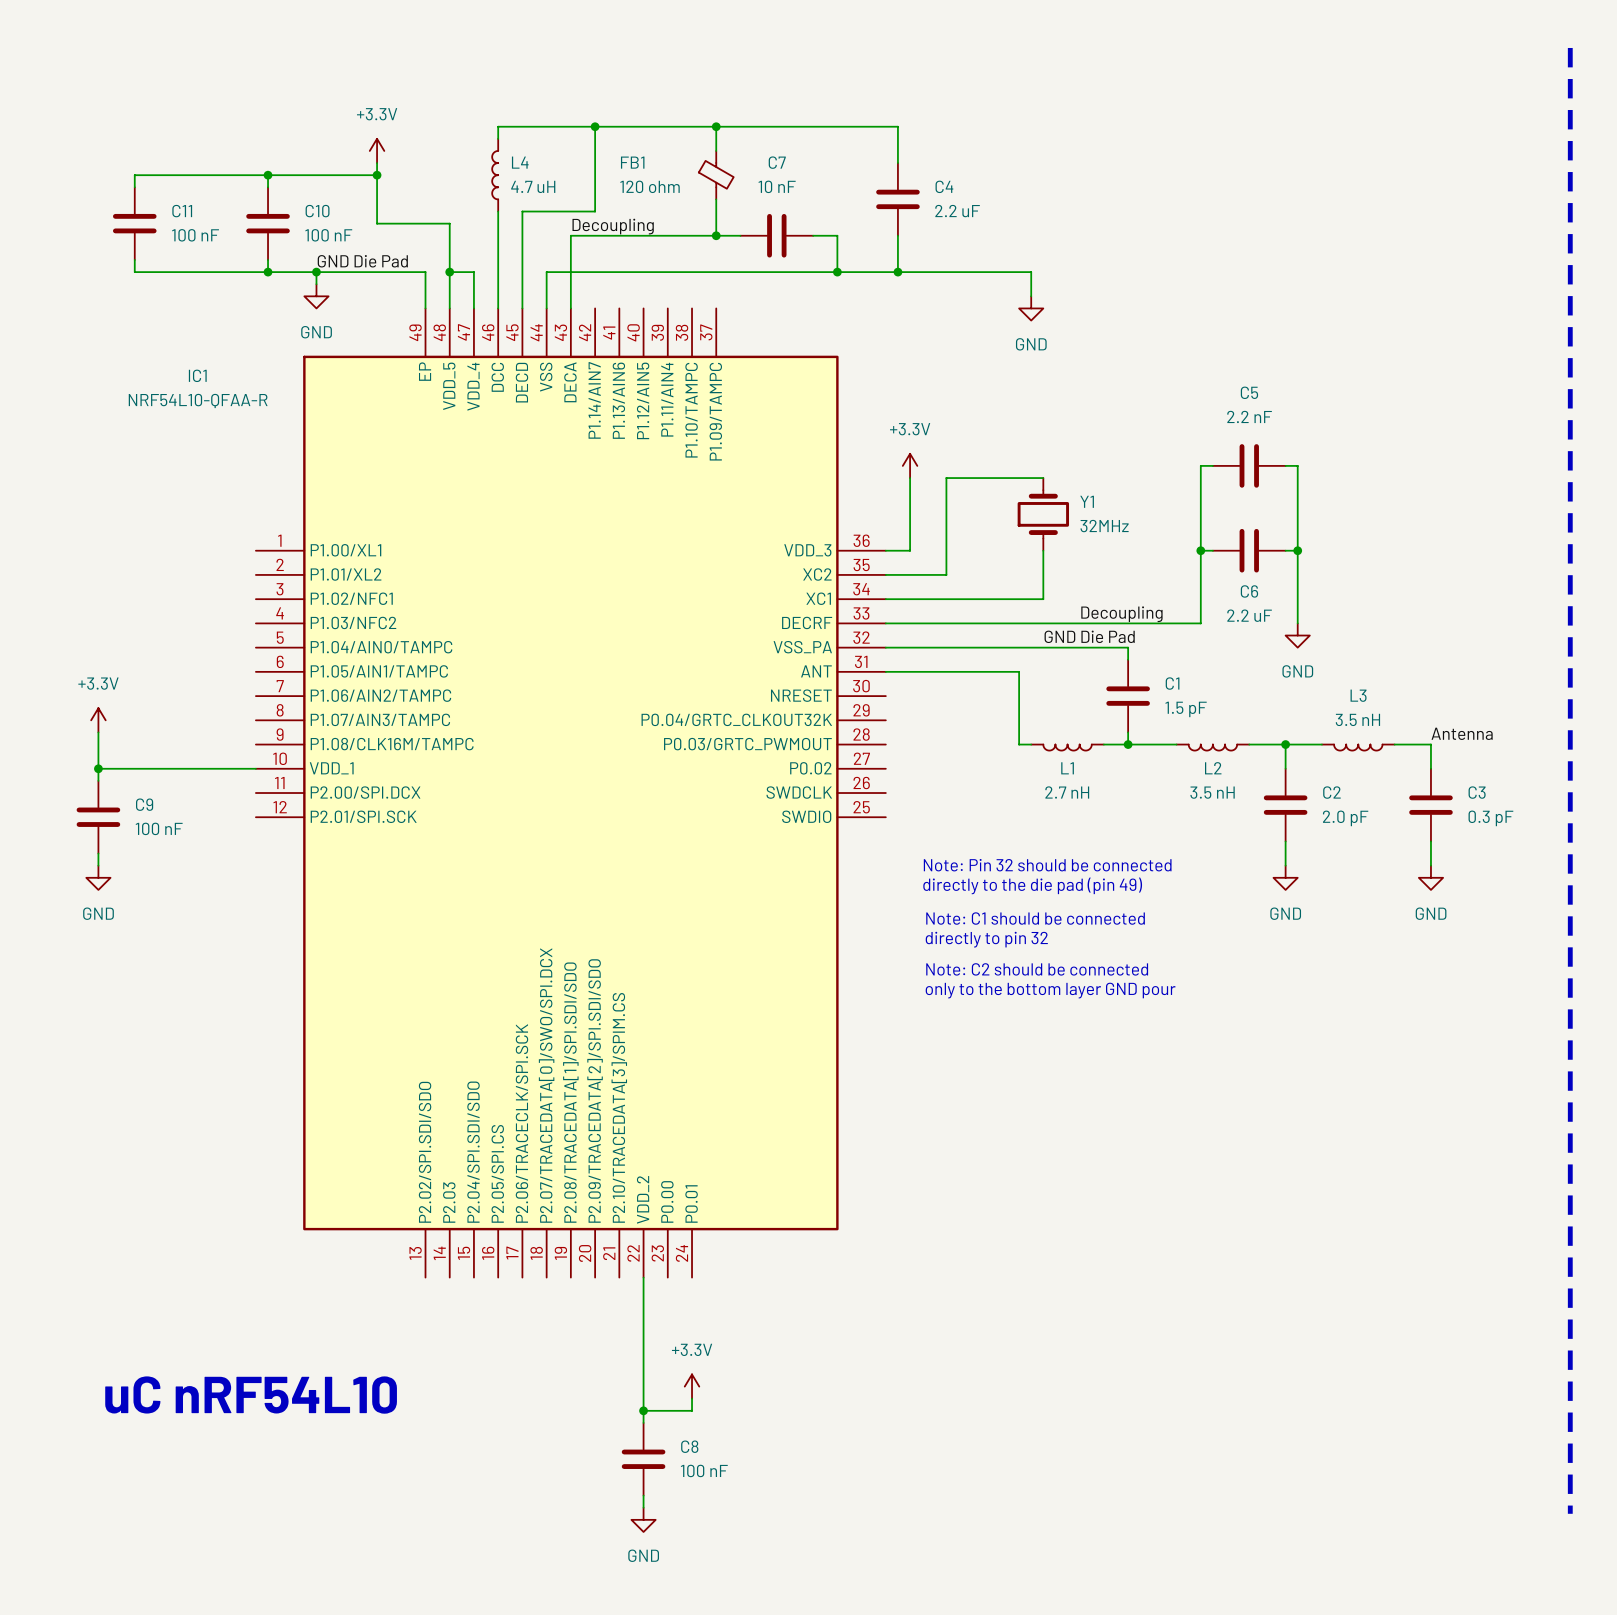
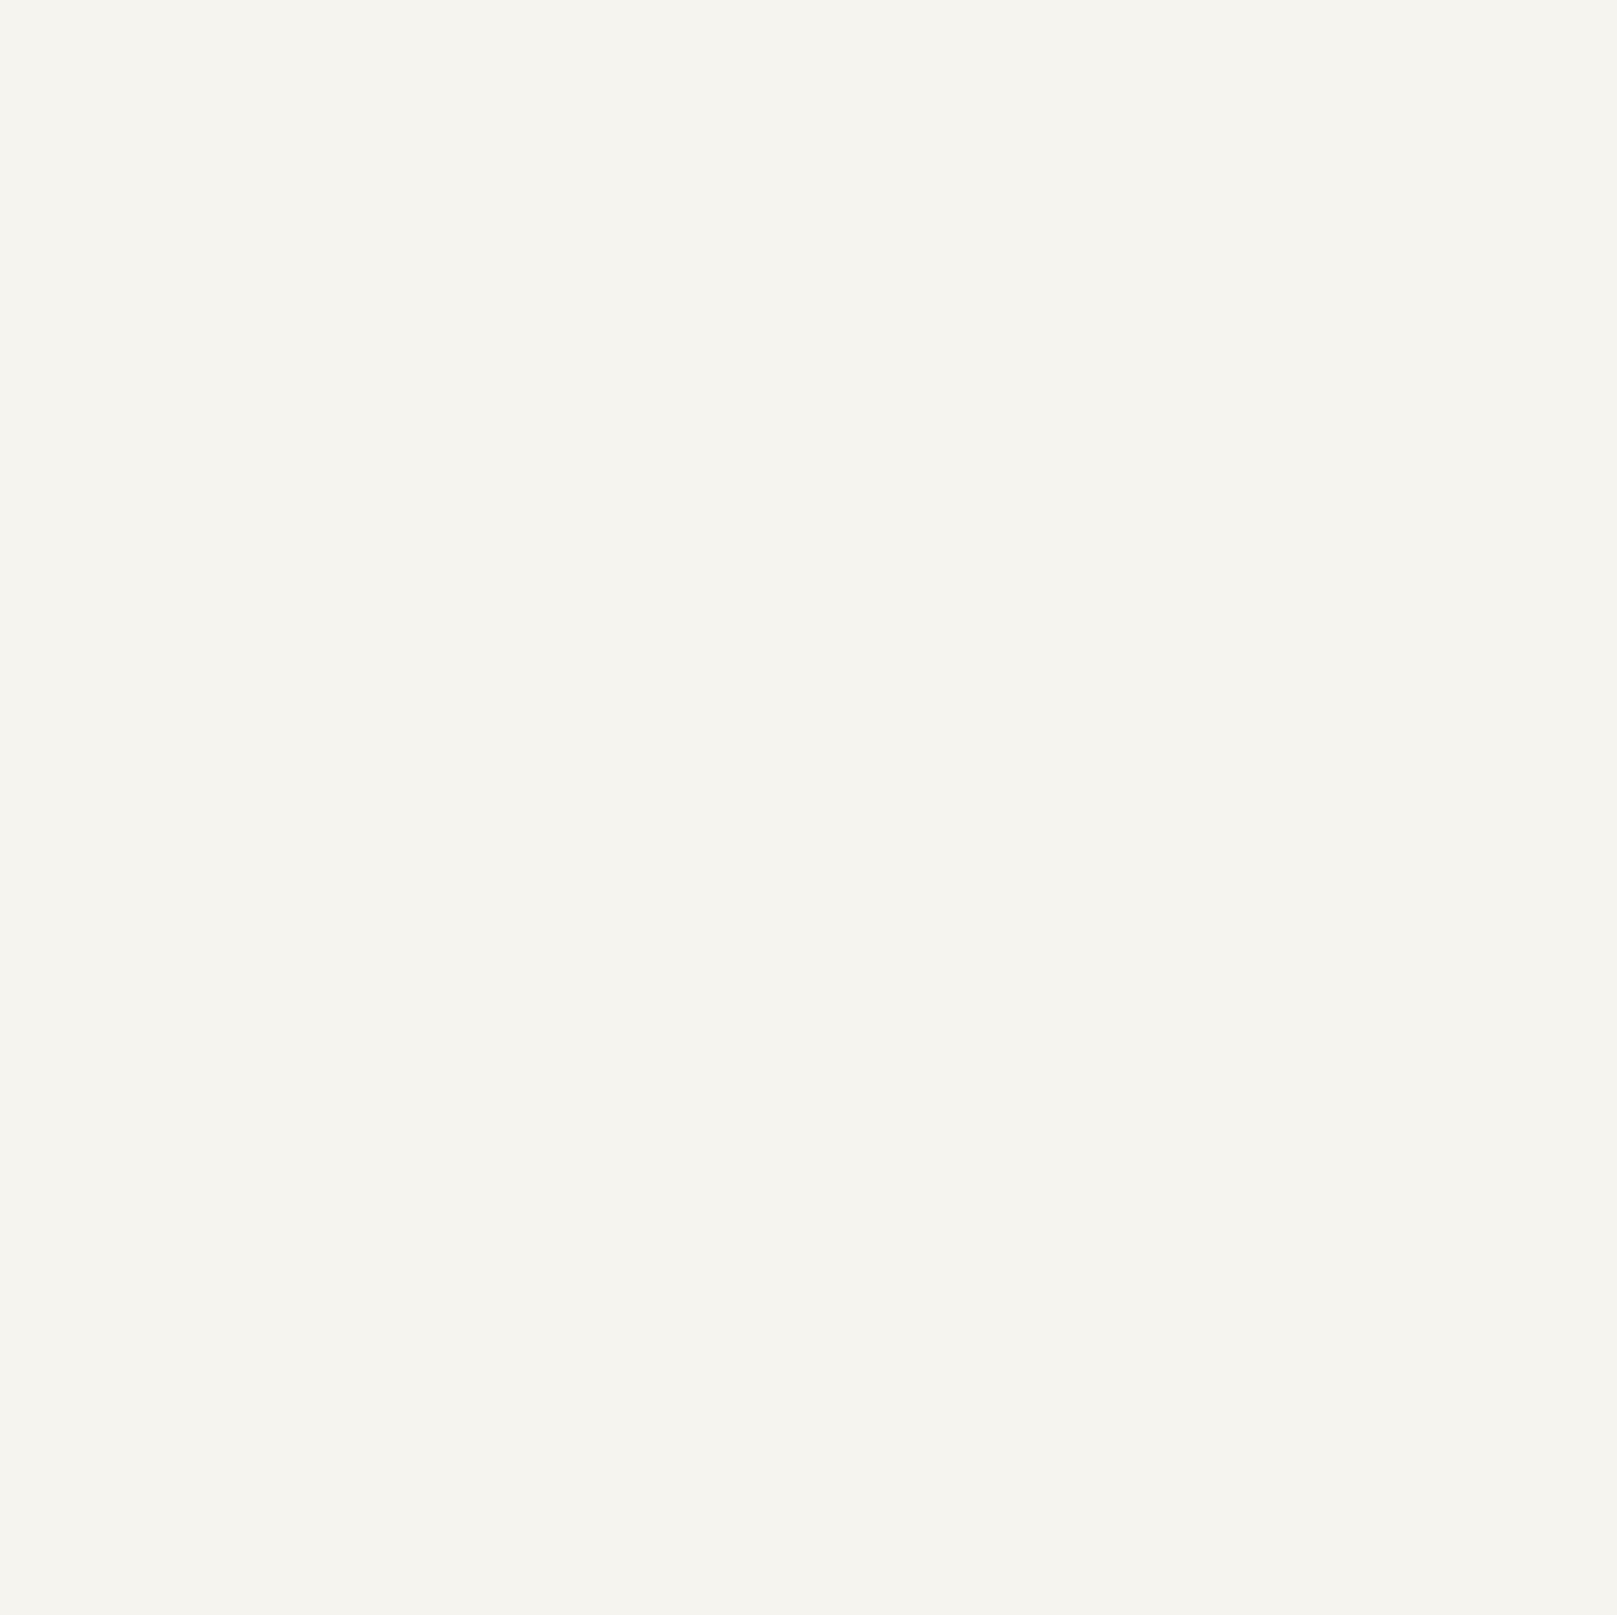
line: (1570, 47) (1570, 1513) -> none
wire: (595, 126) (595, 211) (522, 211) (522, 308) -> none
junction: (595, 126) -> none
wire: (716, 126) (716, 150) -> none
junction: (716, 126) -> none
wire: (498, 138) (498, 126) (897, 126) (897, 163) -> none
power symbol: +3.3V (377, 150) -> none
wire: (377, 163) (377, 223) (449, 223) (449, 308) -> none
wire: (268, 175) (268, 187) -> none
junction: (268, 175) -> none
wire: (377, 175) (134, 175) (134, 187) -> none
junction: (377, 175) -> none
L4: 4.7 uH (495, 175) -> none
FB1: 120 ohm (716, 175) -> none
wire: (716, 199) (716, 235) -> none
C4: 2.2 uF (897, 199) -> none
wire: (498, 211) (498, 308) -> none
C11: 100 nF (134, 223) -> none
C10: 100 nF (268, 223) -> none
label: Decoupling (613, 226) -> none
junction: (716, 235) -> none
wire: (740, 235) (570, 235) (570, 308) -> none
C7: 10 nF (776, 235) -> none
wire: (813, 235) (837, 235) (837, 272) -> none
wire: (897, 235) (897, 272) -> none
wire: (134, 259) (134, 272) (425, 272) (425, 308) -> none
wire: (268, 259) (268, 272) -> none
label: GND Die Pad (362, 261) -> none
junction: (268, 272) -> none
wire: (316, 272) (316, 284) -> none
junction: (316, 272) -> none
wire: (449, 272) (473, 272) (473, 308) -> none
junction: (449, 272) -> none
junction: (837, 272) -> none
junction: (897, 272) -> none
power symbol: GND (316, 296) -> none
wire: (1031, 296) (1031, 272) (546, 272) (546, 308) -> none
power symbol: GND (1031, 308) -> none
power symbol: +3.3V (910, 465) -> none
wire: (1212, 465) (1200, 465) (1200, 623) (885, 623) -> none
C5: 2.2 nF (1249, 465) -> none
wire: (1285, 465) (1297, 465) (1297, 623) -> none
wire: (910, 478) (910, 550) (885, 550) -> none
wire: (1043, 478) (946, 478) (946, 574) (885, 574) -> none
Y1: 32MHz (1043, 514) -> none
wire: (1043, 550) (1043, 599) (885, 599) -> none
wire: (1200, 550) (1212, 550) -> none
junction: (1200, 550) -> none
C6: 2.2 uF (1249, 550) -> none
wire: (1285, 550) (1297, 550) -> none
junction: (1297, 550) -> none
label: Decoupling (1121, 614) -> none
power symbol: GND (1297, 635) -> none
label: GND Die Pad (1089, 636) -> none
wire: (885, 647) (1128, 647) (1128, 659) -> none
wire: (885, 671) (1019, 671) (1019, 744) (1031, 744) -> none
C1: 1.5 pF (1128, 696) -> none
power symbol: +3.3V (98, 720) -> none
wire: (98, 732) (98, 780) -> none
wire: (1128, 732) (1128, 744) -> none
label: Antenna (1462, 733) -> none
wire: (1103, 744) (1176, 744) -> none
junction: (1128, 744) -> none
wire: (1249, 744) (1321, 744) -> none
wire: (1285, 744) (1285, 768) -> none
junction: (1285, 744) -> none
wire: (1394, 744) (1430, 744) (1430, 768) -> none
L1: 2.7 nH (1067, 747) -> none
L2: 3.5 nH (1212, 747) -> none
L3: 3.5 nH (1358, 747) -> none
wire: (98, 768) (255, 768) -> none
junction: (98, 768) -> none
IC1: NRF54L10-QFAA-R (570, 793) -> none
C2: 2.0 pF (1285, 805) -> none
C3: 0.3 pF (1430, 805) -> none
C9: 100 nF (98, 817) -> none
wire: (1285, 841) (1285, 865) -> none
wire: (1430, 841) (1430, 865) -> none
wire: (98, 853) (98, 865) -> none
text: Note: Pin 32 should be connected (1047, 865) -> none
power symbol: GND (98, 877) -> none
power symbol: GND (1285, 877) -> none
power symbol: GND (1430, 877) -> none
text: directly to the die pad (pin 49) (1032, 885) -> none
text: Note: C1 should be connected (1035, 918) -> none
text: directly to pin 32 (986, 939) -> none
text: Note: C2 should be connected (1037, 969) -> none
text: only to the bottom layer GND pour (1050, 990) -> none
wire: (643, 1277) (643, 1422) -> none
power symbol: +3.3V (692, 1386) -> none
text: uC nRF54L10 (251, 1395) -> none
wire: (692, 1398) (692, 1410) (643, 1410) -> none
junction: (643, 1410) -> none
C8: 100 nF (643, 1459) -> none
wire: (643, 1495) (643, 1507) -> none
power symbol: GND (643, 1519) -> none

